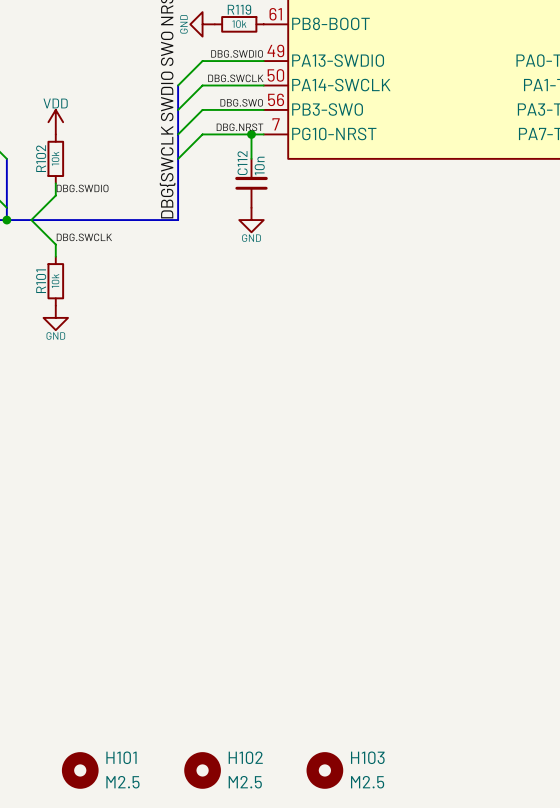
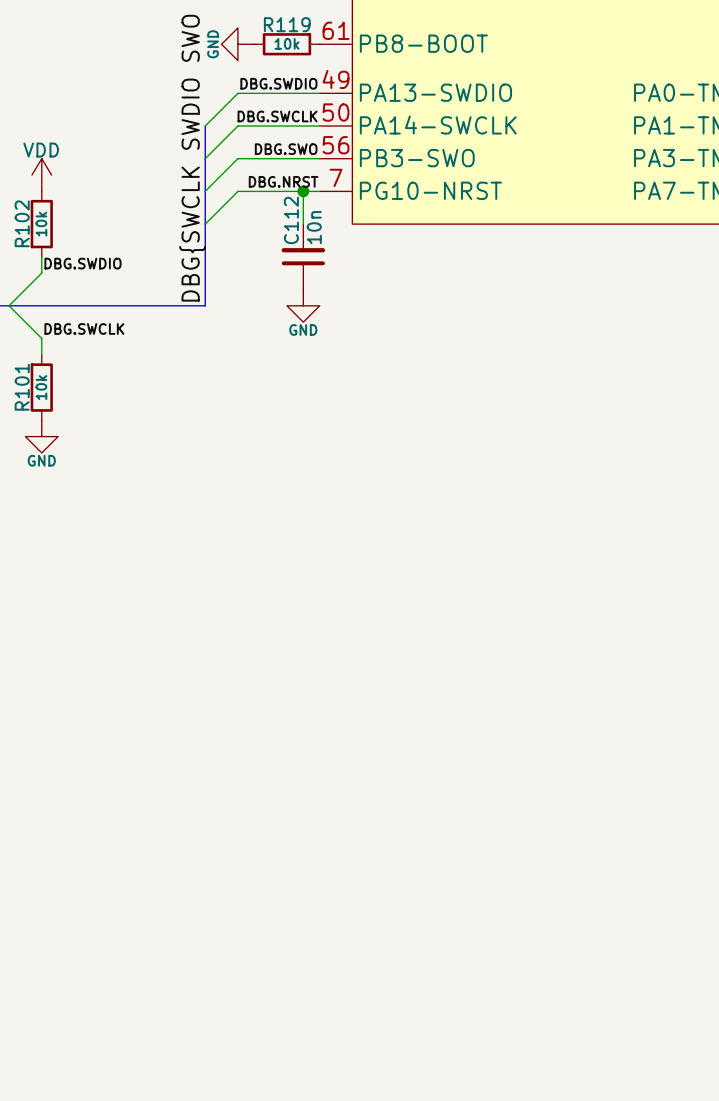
H101: M2.5 (80, 770) -> none
H102: M2.5 (202, 770) -> none
H103: M2.5 (324, 770) -> none

